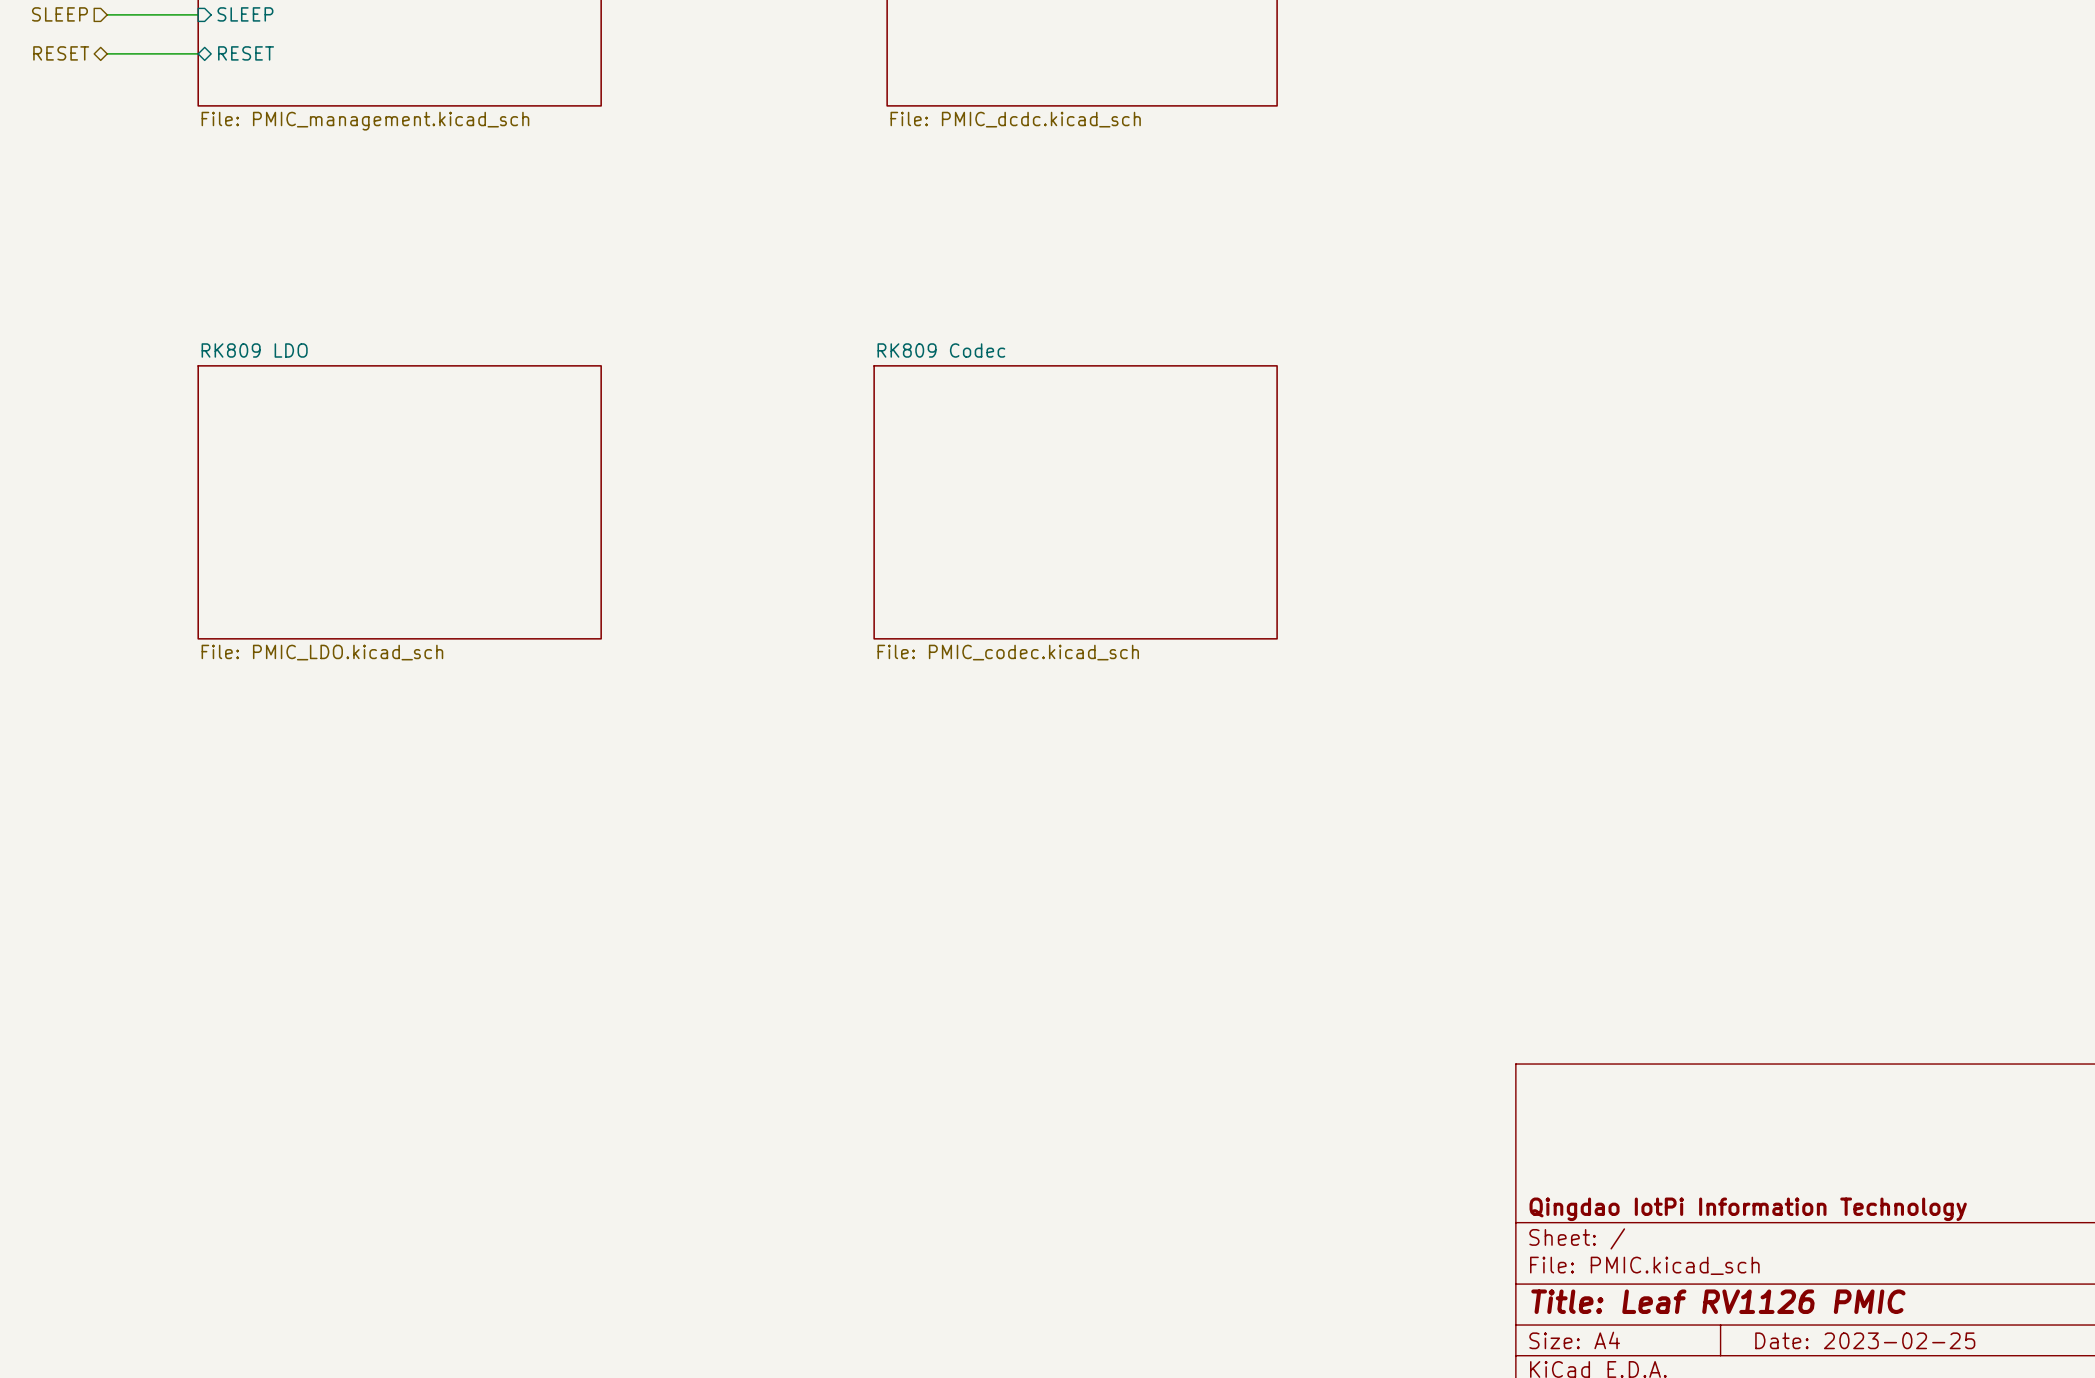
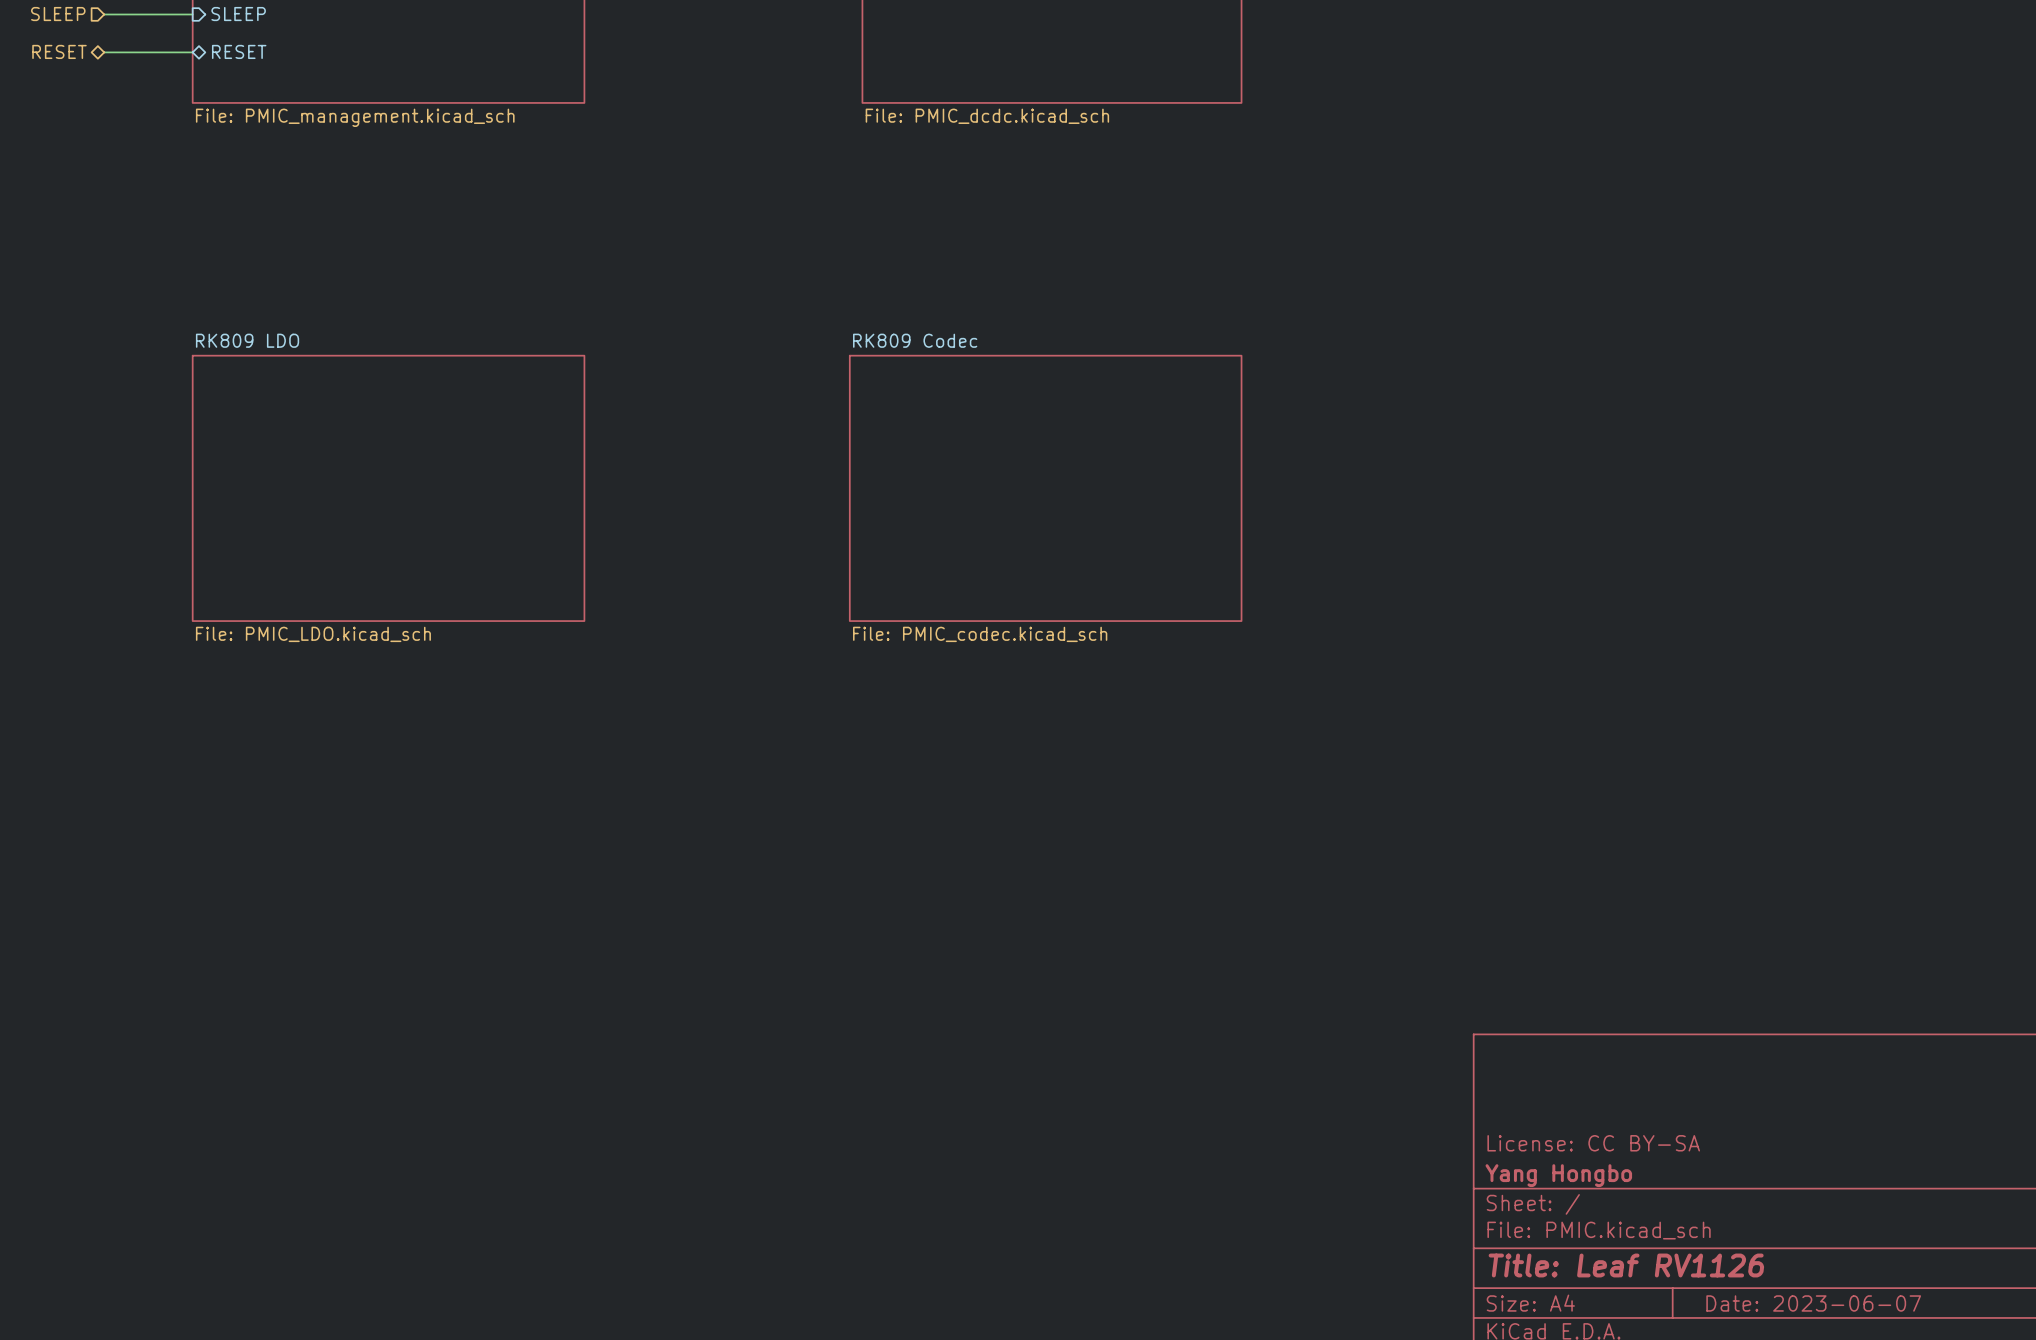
title block: none -> License: CC BY-SA (1593, 1143)
title block: Qingdao IotPi Information Technology (1748, 1209) -> Yang Hongbo (1558, 1175)
title block: Title: Leaf RV1126 PMIC (1718, 1301) -> Title: Leaf RV1126 (1626, 1265)
title block: Date: 2023-02-25 (1865, 1340) -> Date: 2023-06-07 (1813, 1303)

